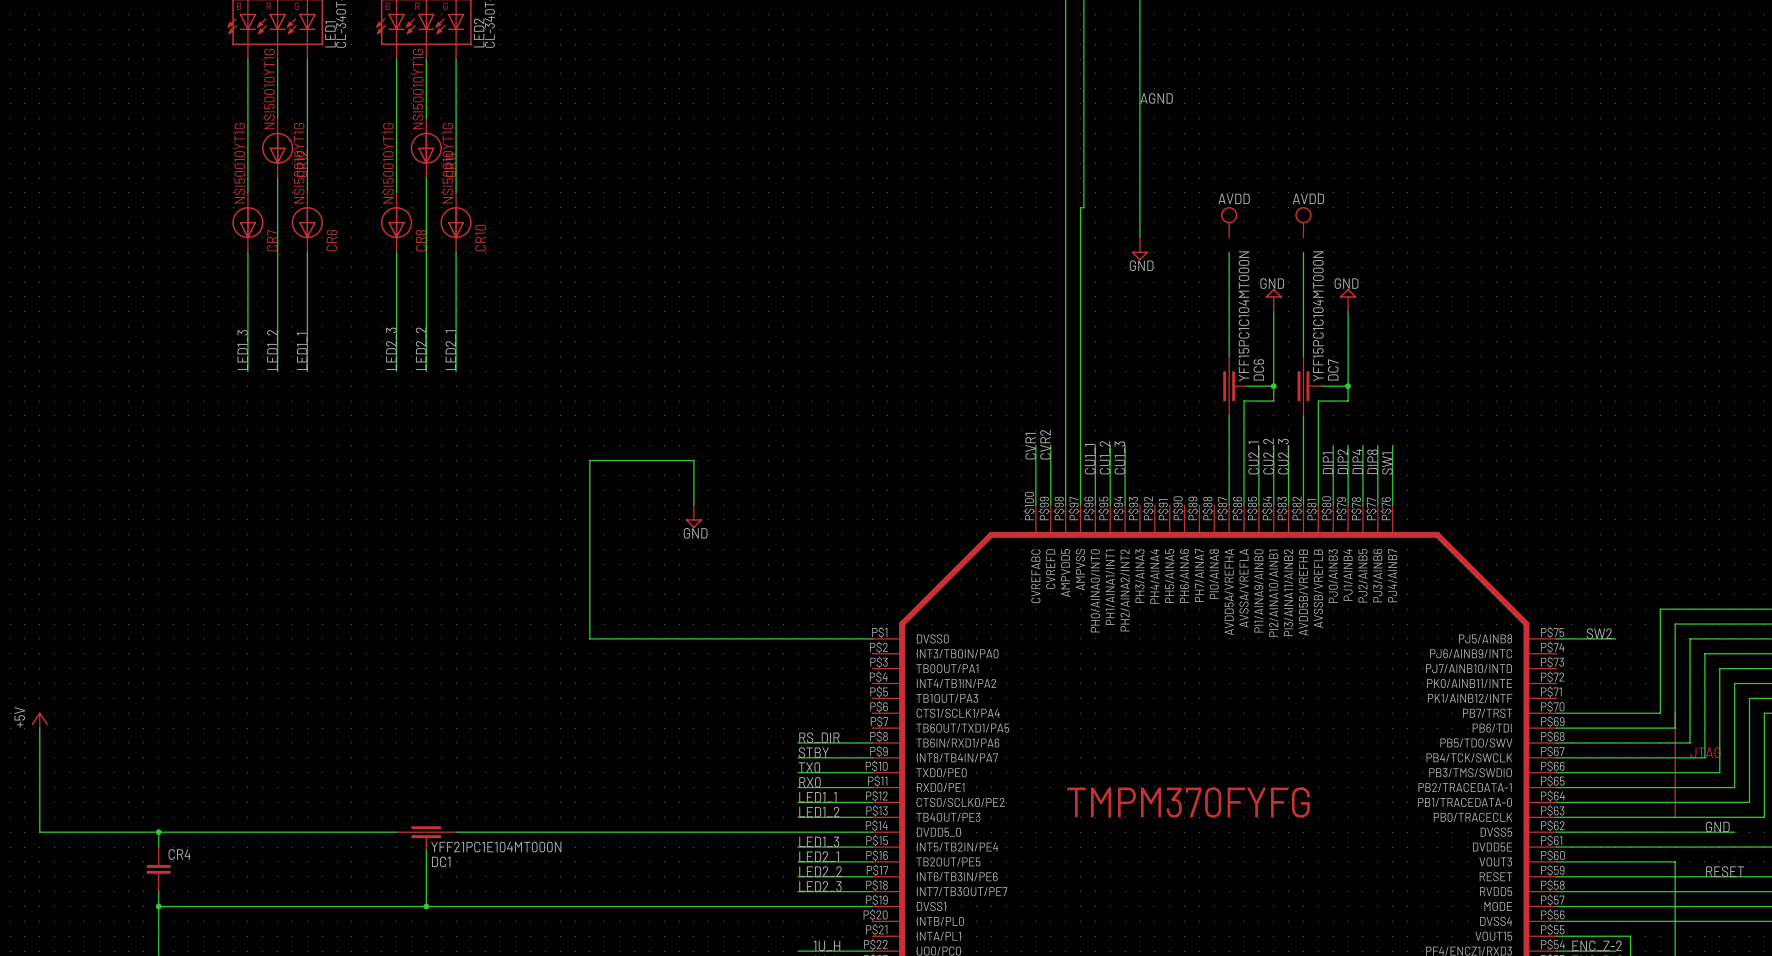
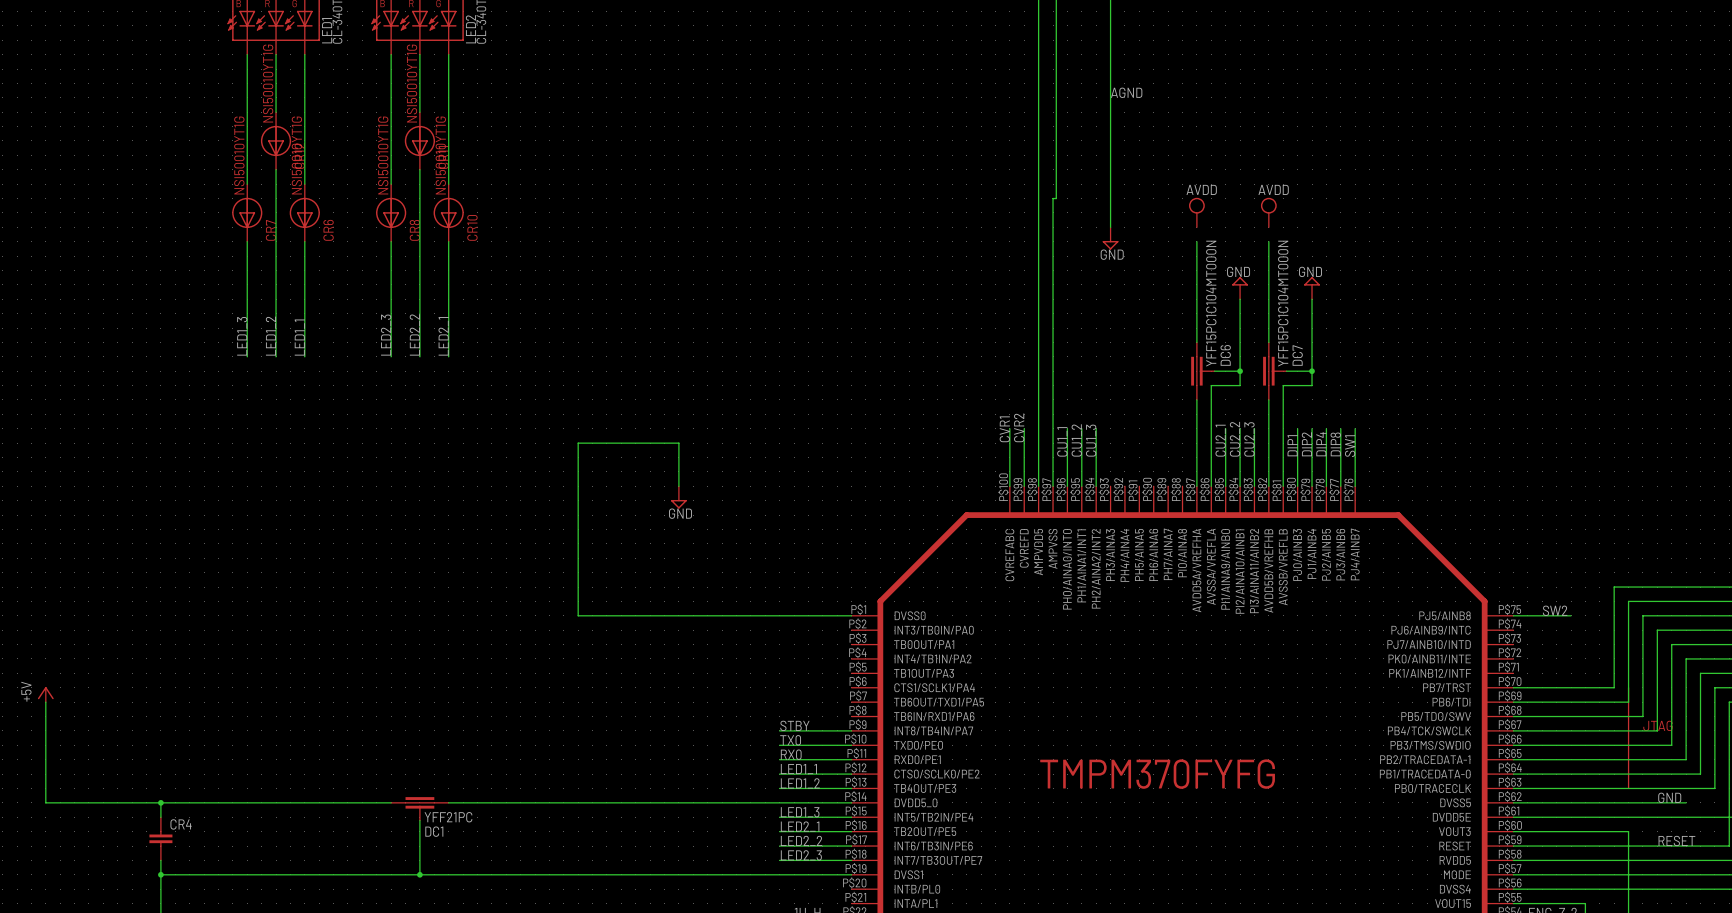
label: RS_DIR (819, 737) -> none
wire: (798, 742) (872, 742) -> none
DC1 value: YFF21PC1E104MT000N (496, 847) -> YFF21PC (448, 817)

